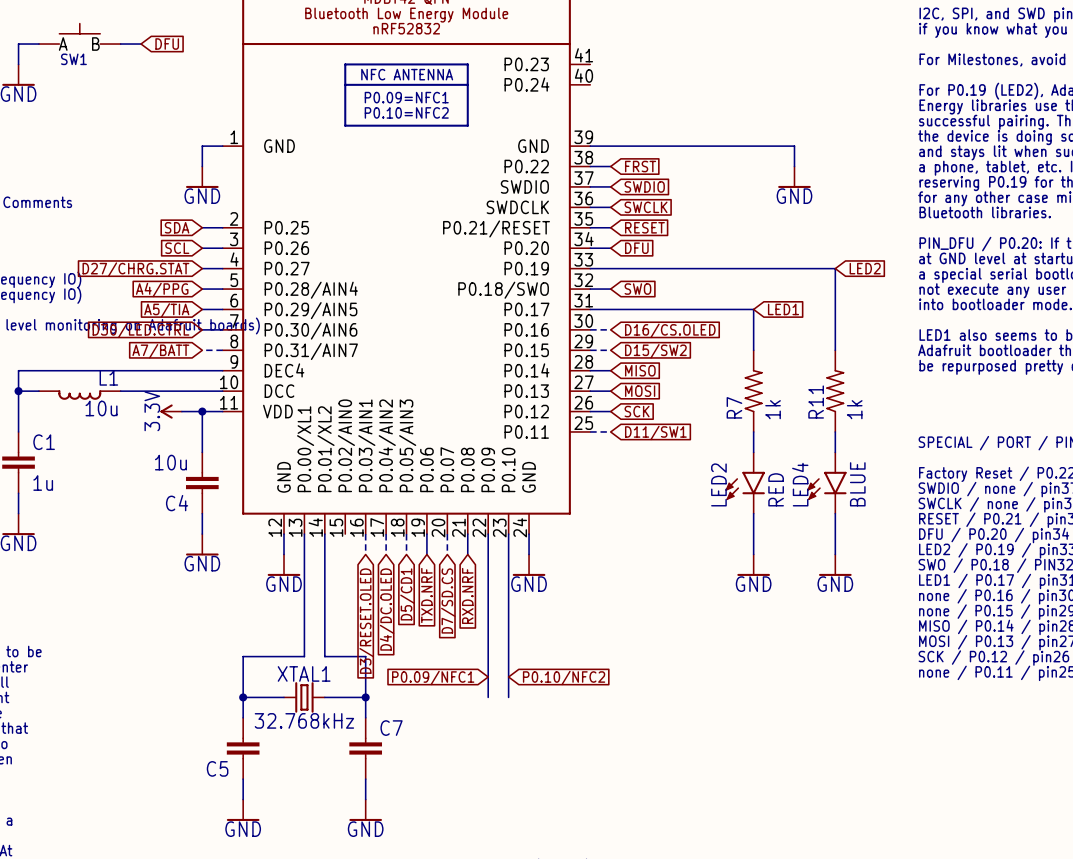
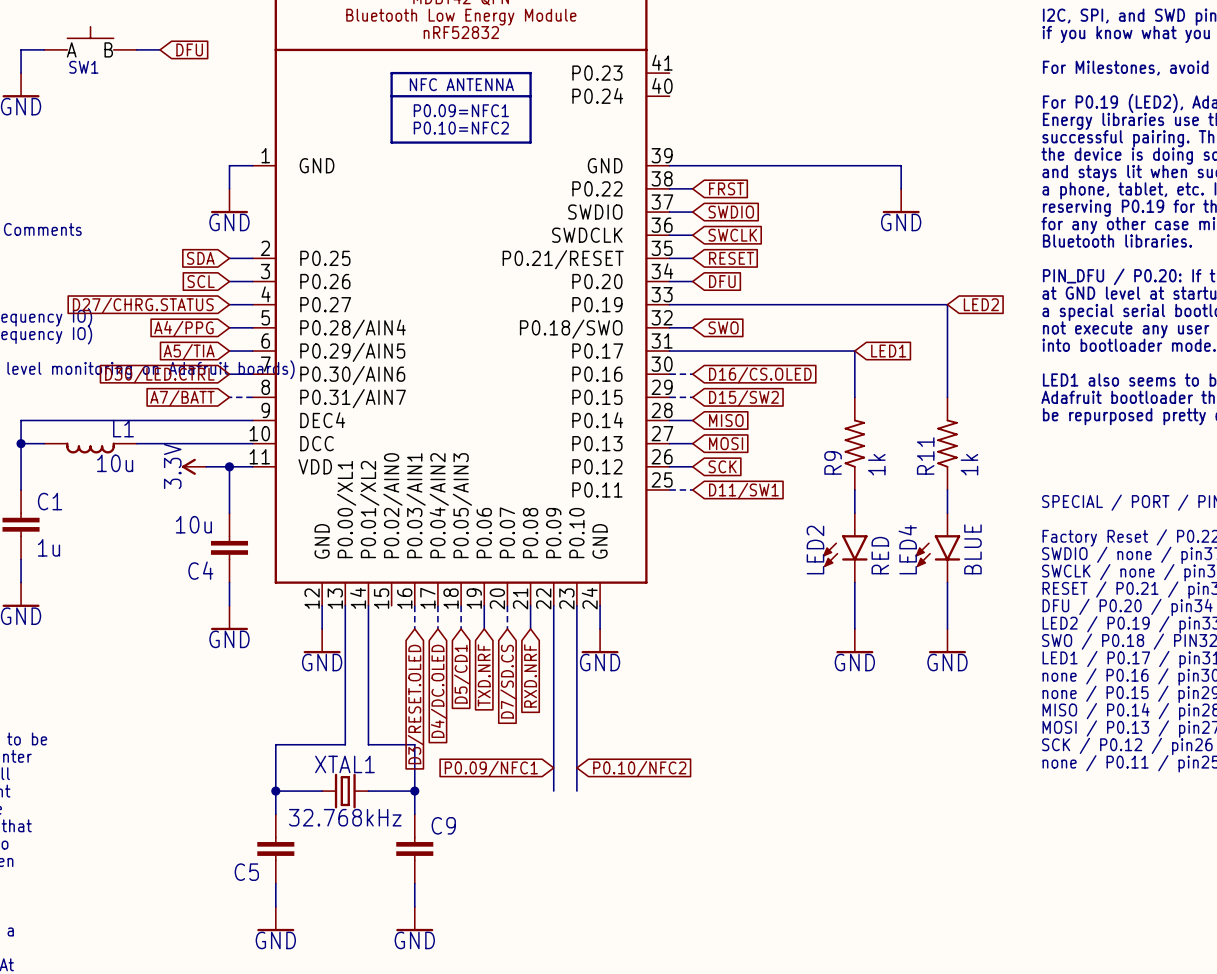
global label: D27/CHRG.STAT (135, 269) -> D27/CHRG.STATUS (143, 305)
R7 name: R7 (734, 407) -> R9 (833, 462)
C7 name: C7 (391, 728) -> C9 (443, 825)

